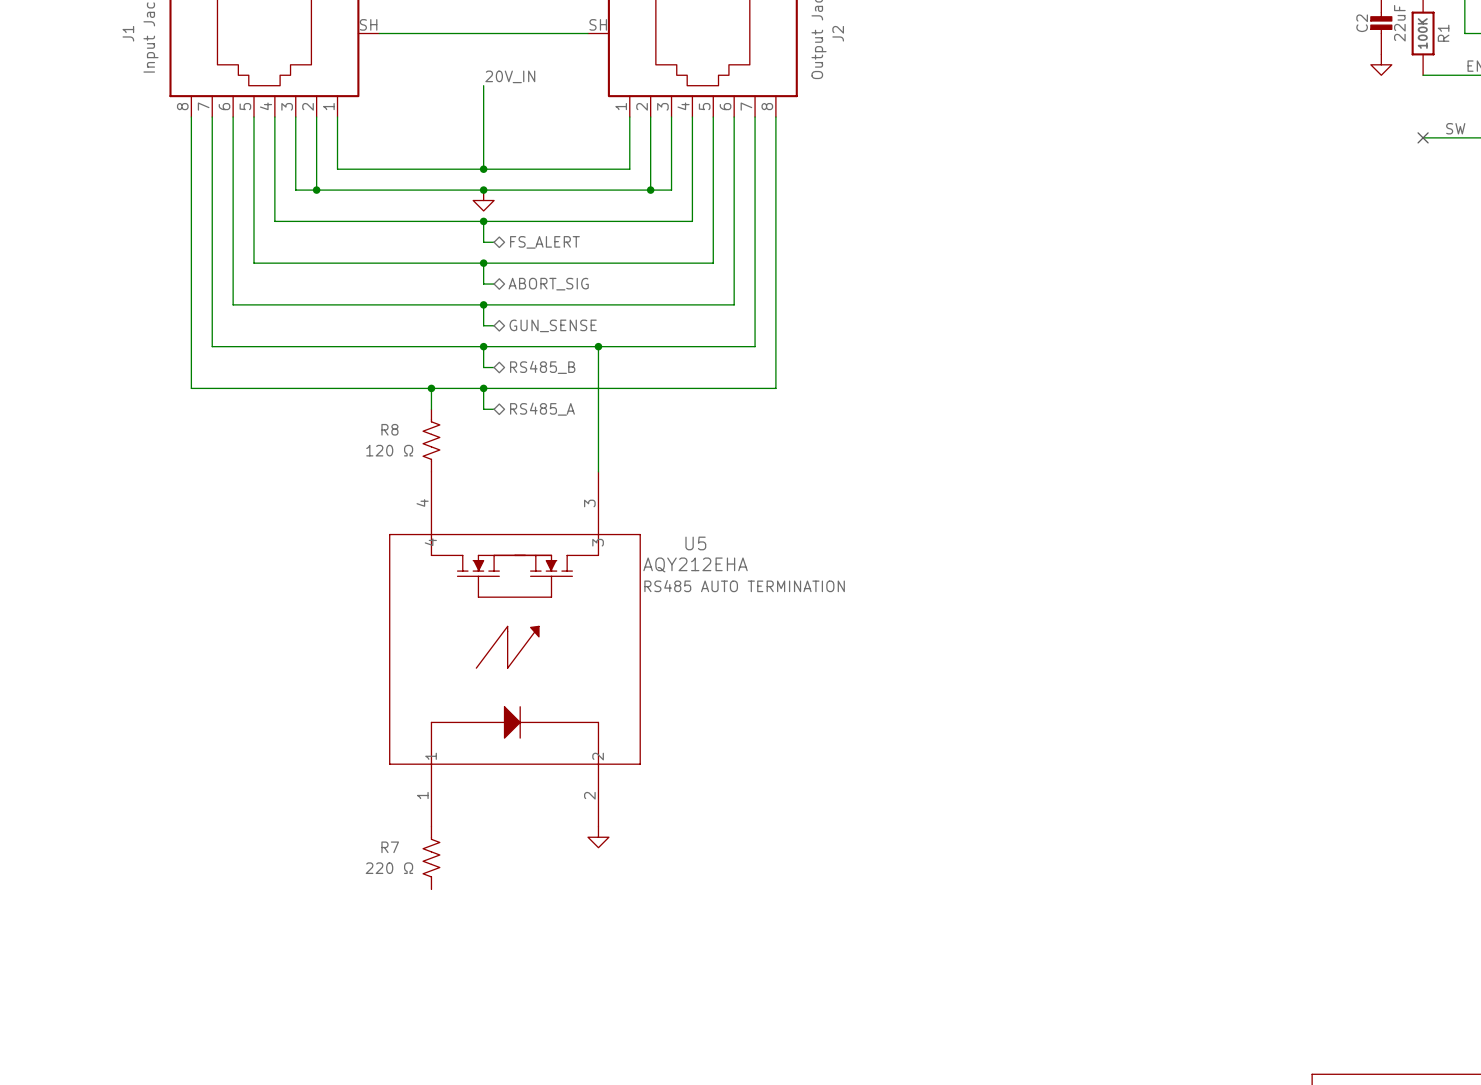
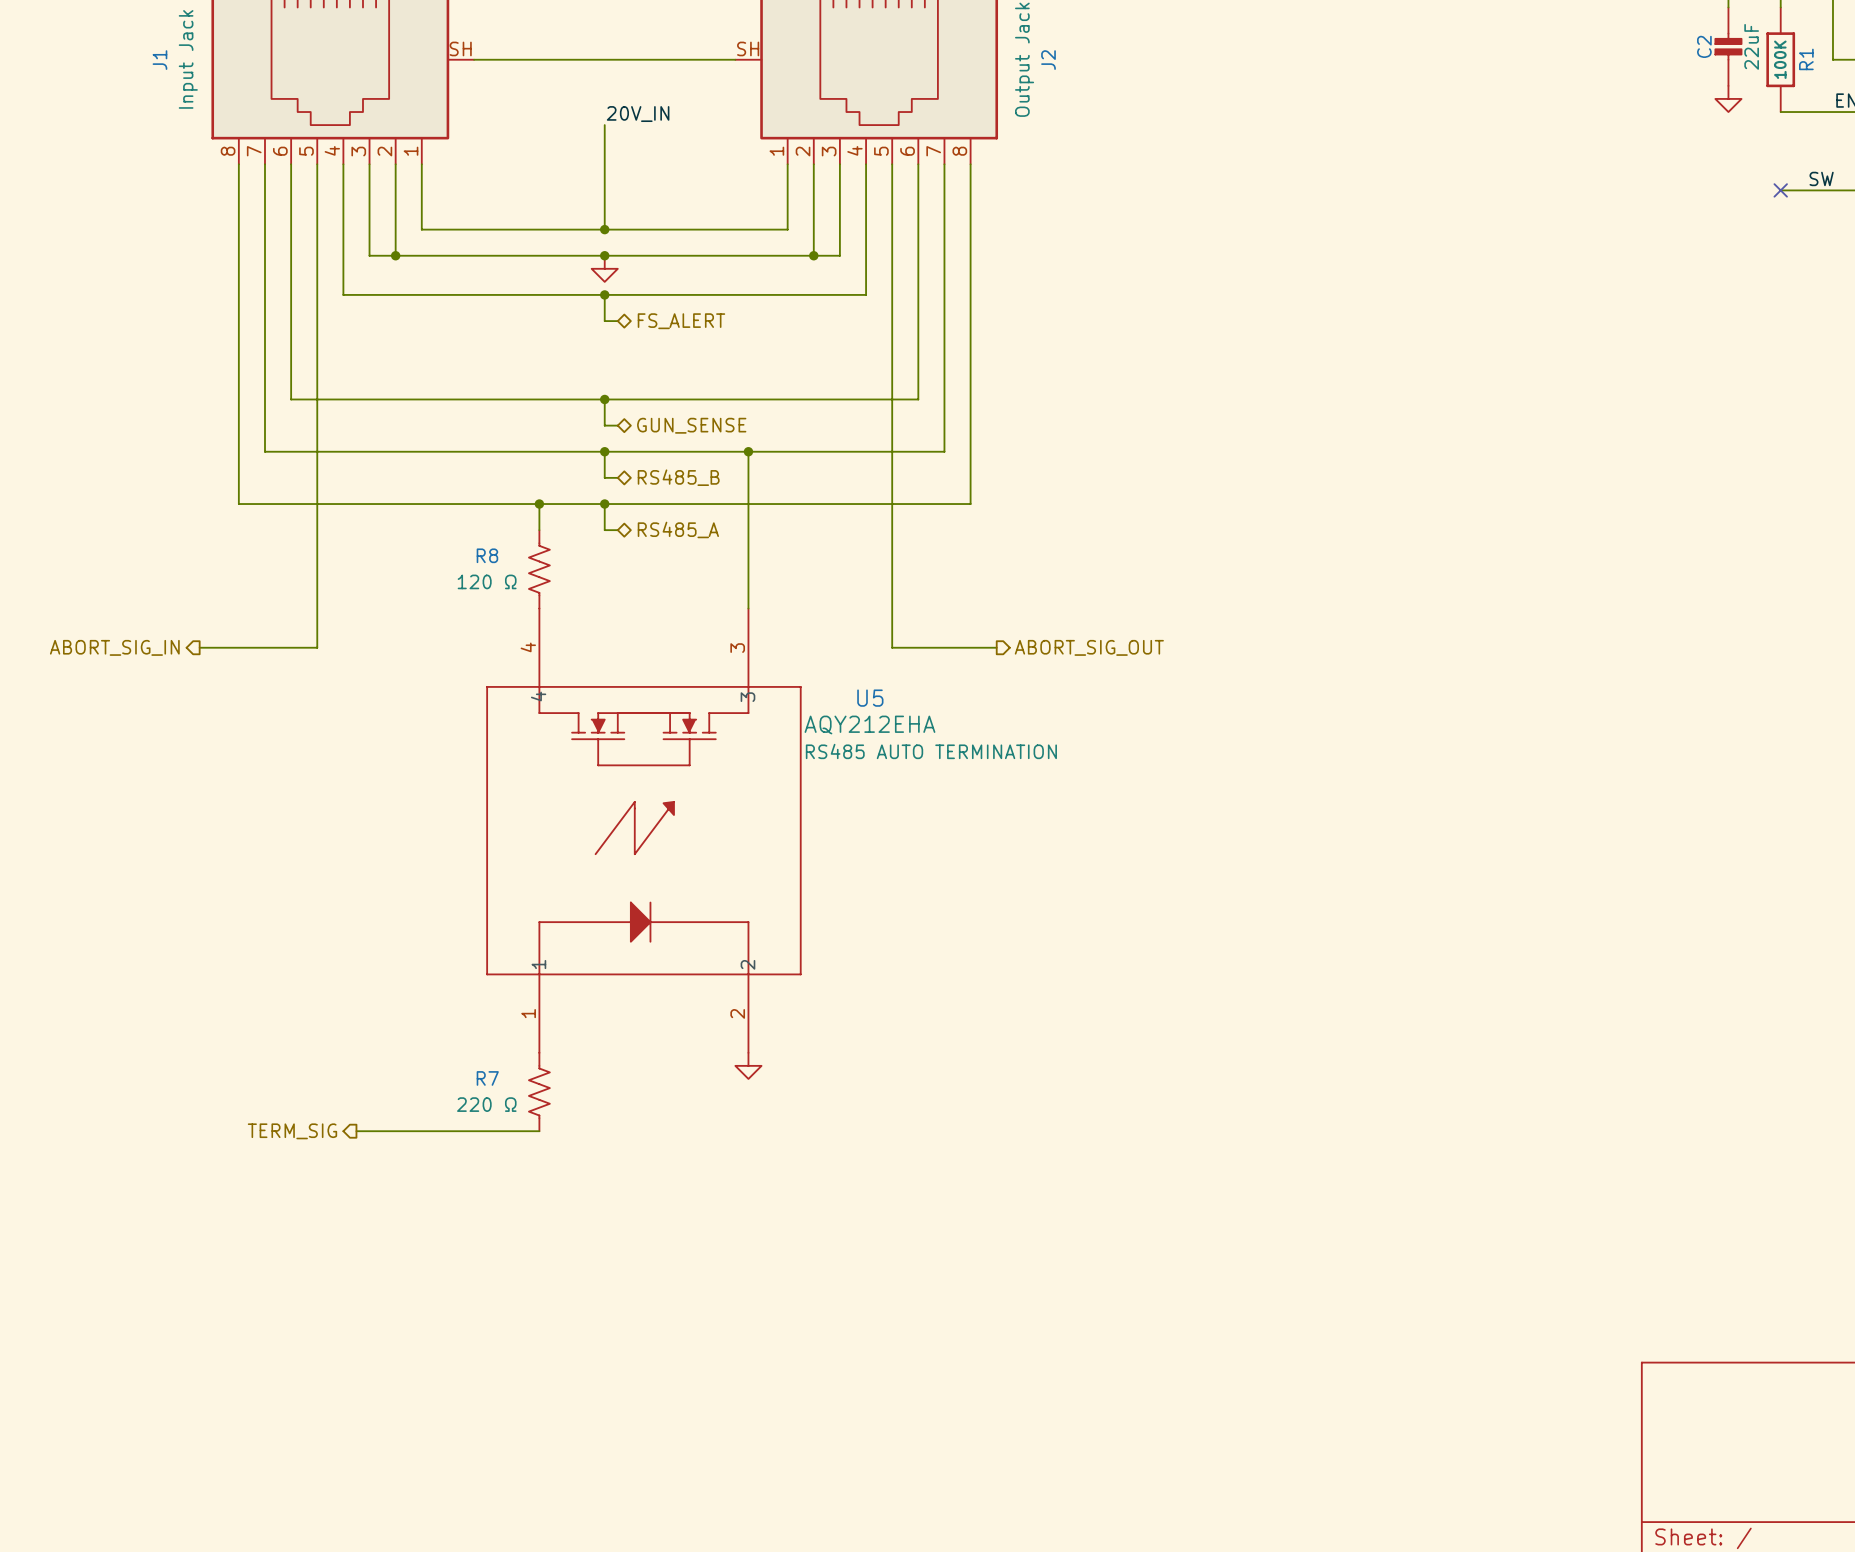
wire: (254, 263) (713, 263) -> (996, 647) (892, 647) (892, 347)
wire: none -> (317, 347) (317, 647) (199, 647)
wire: (483, 263) (483, 284) (494, 284) -> none
junction: (483, 263) -> none
hierarchical label: ABORT_SIG (548, 284) -> none
hierarchical label: none -> ABORT_SIG_IN (114, 647)
hierarchical label: none -> ABORT_SIG_OUT (1089, 647)
hierarchical label: none -> TERM_SIG (292, 1131)
wire: none -> (356, 1131) (539, 1131)

